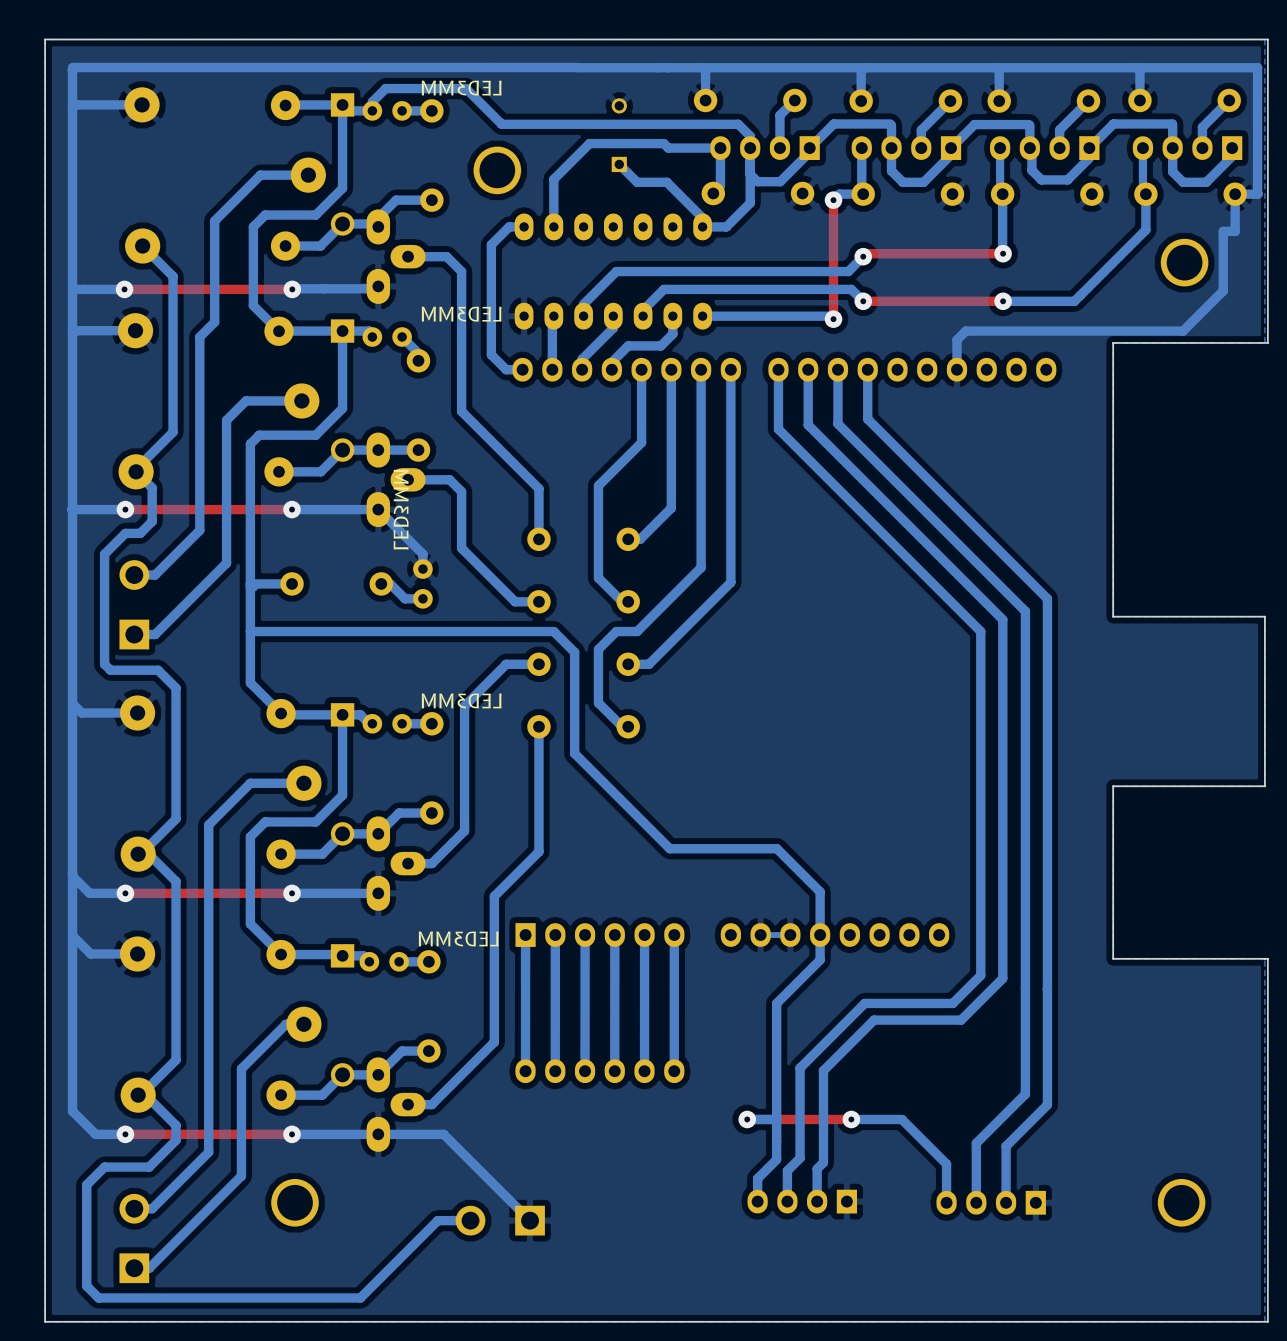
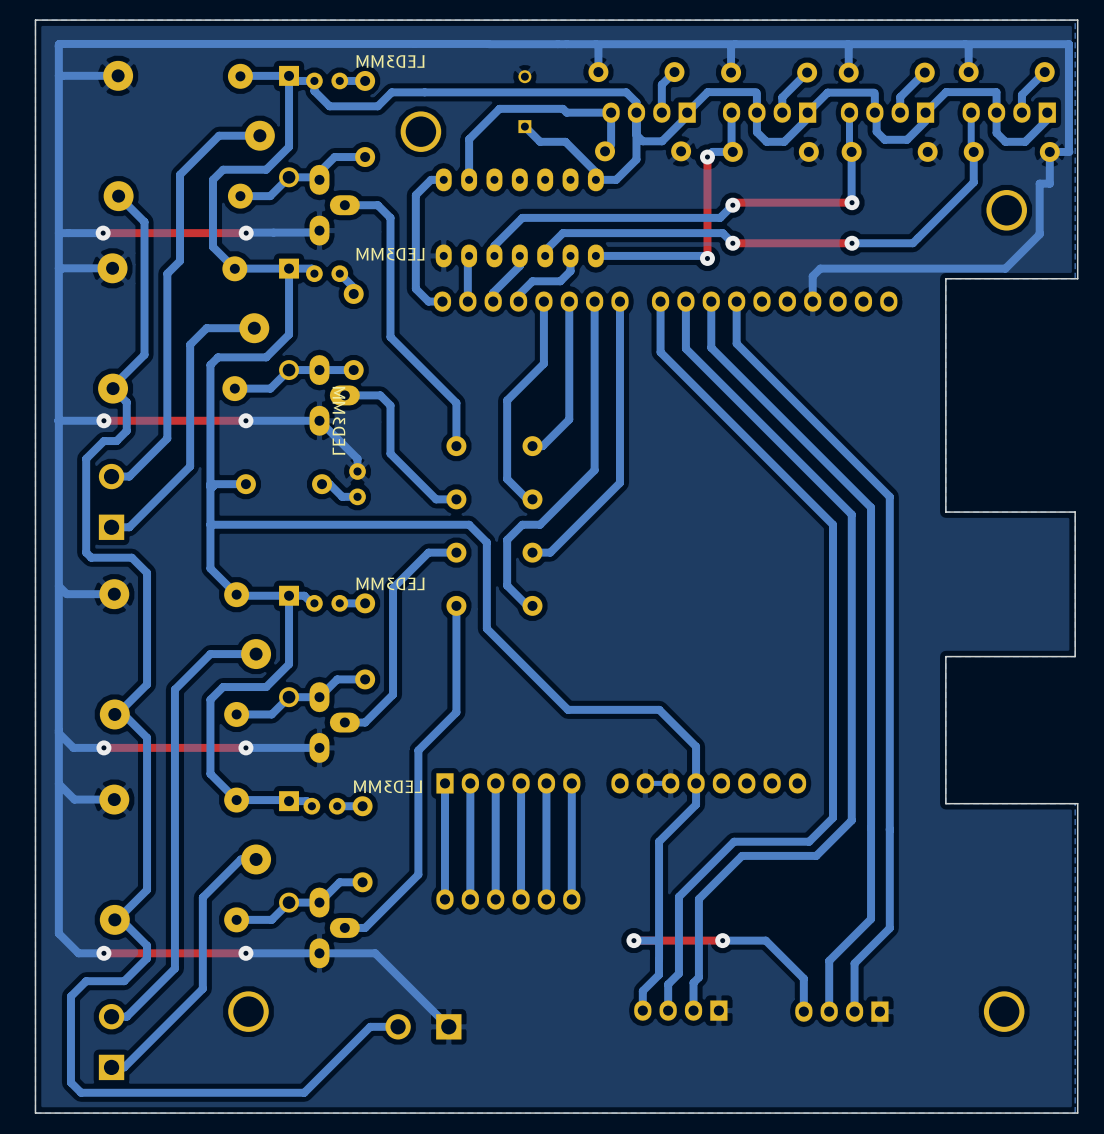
bottom track: (372, 110) (372, 101) (385, 88) (466, 88) (501, 124) -> (314, 80) (314, 91) (329, 106) (377, 106) (391, 92) (424, 92)

